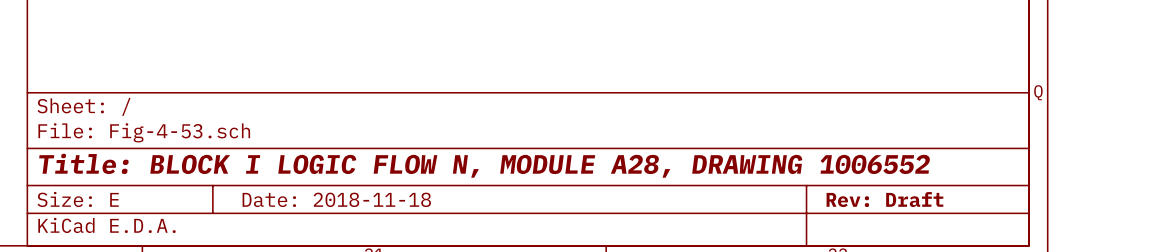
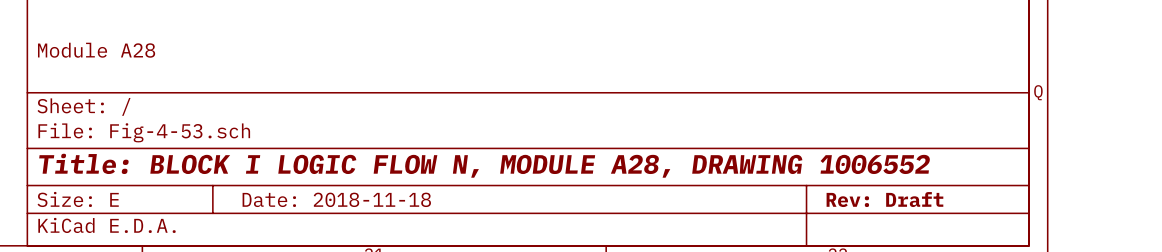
title block: none -> Module A28 (96, 50)

